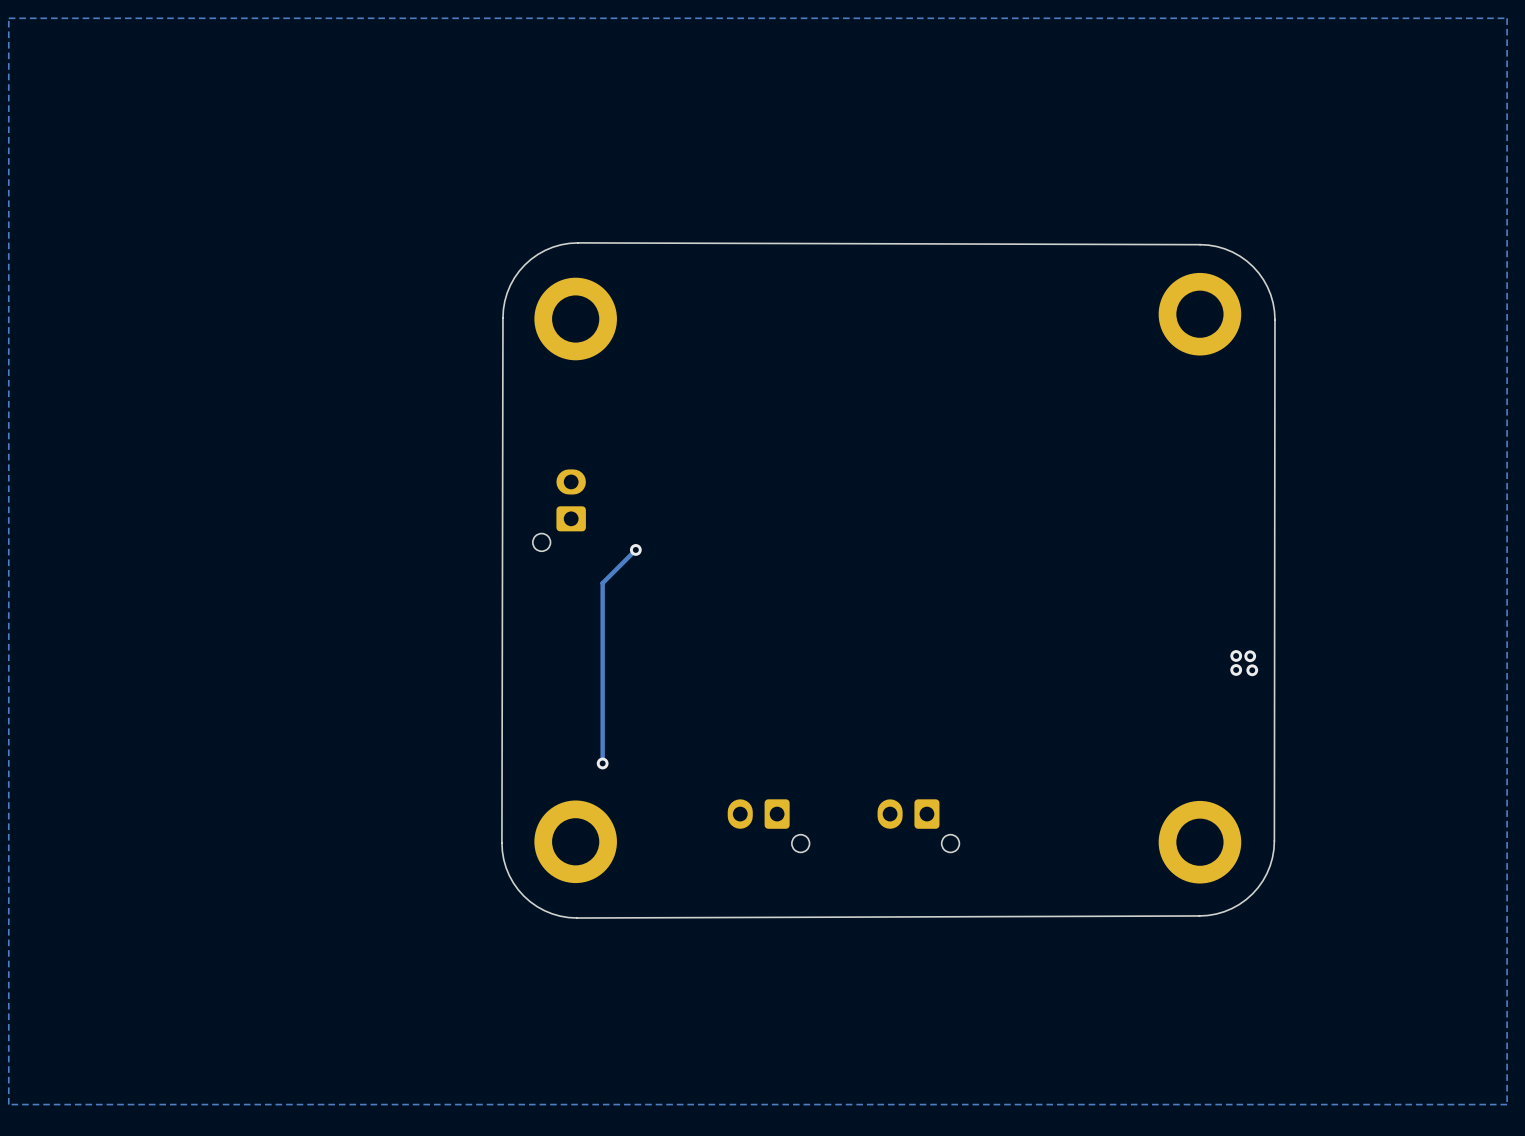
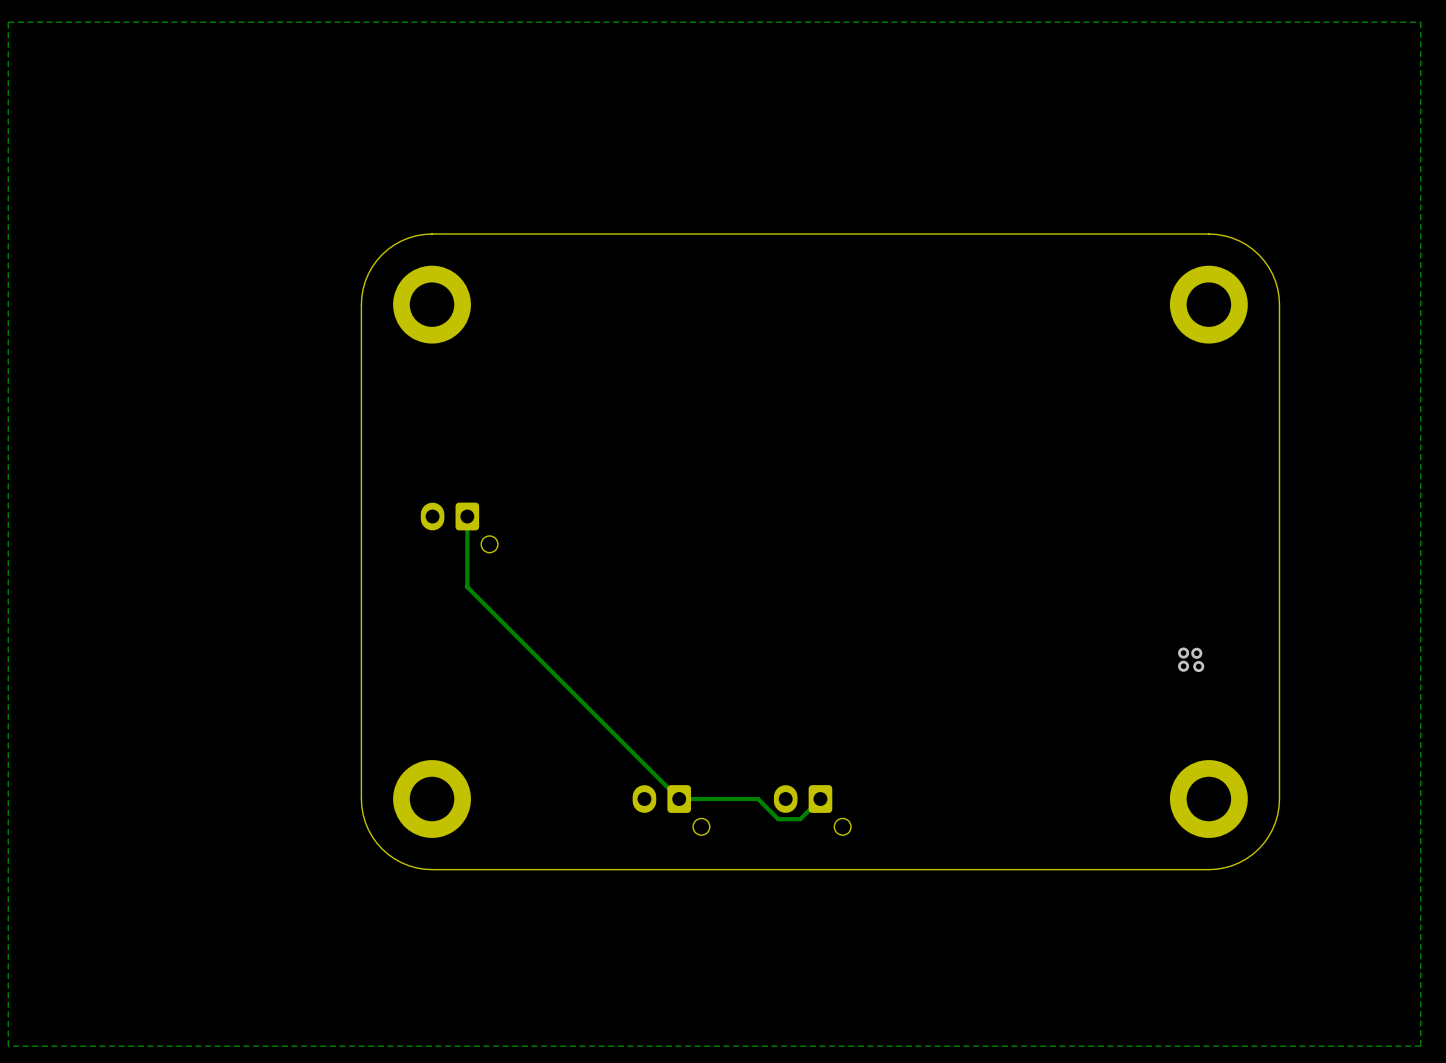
board edge: (577, 242) (1200, 244) (1216, 246) (1232, 252) (1253, 266) (1263, 279) (1270, 294) (1274, 319) (1274, 841) (1270, 865) (1262, 880) (1252, 894) (1231, 908) (1216, 914) (1199, 915) (576, 918) (560, 916) (544, 910) (523, 896) (509, 875) (503, 859) (501, 843) (503, 309) (507, 293) (514, 277) (531, 259) (553, 247) (577, 242) -> (1208, 234) (1232, 237) (1246, 244) (1258, 254) (1272, 274) (1279, 296) (1279, 799) (1277, 814) (1272, 829) (1264, 843) (1252, 854) (1232, 865) (1208, 869) (432, 869) (416, 867) (401, 862) (387, 854) (376, 843) (365, 822) (361, 799) (361, 304) (363, 288) (368, 274) (376, 260) (387, 249) (408, 237) (432, 234) (1208, 234)
part position: (1199, 314) -> (1208, 304)
part position: (575, 318) -> (432, 304)
part rotation: 0° (559, 510) -> 90° counterclockwise (459, 527)
part position: (559, 510) -> (459, 527)
track: none -> (467, 516) (467, 587)
track: (635, 549) (602, 583) (602, 763) -> none
via: (635, 549) -> none
track: none -> (466, 586) (679, 799) (758, 799) (778, 819) (800, 819) (820, 799)
via: (1236, 655) -> none
via: (1250, 656) -> none
via: (1236, 669) -> none
via: (1252, 670) -> none
via: none -> (1183, 653)
via: none -> (1196, 653)
via: none -> (1183, 666)
via: none -> (1198, 666)
via: (602, 763) -> none
part: (768, 825) -> none
part: (918, 825) -> none
part position: (575, 841) -> (432, 799)
part position: (1199, 842) -> (1208, 799)
part: none -> (671, 810)
part: none -> (812, 810)

